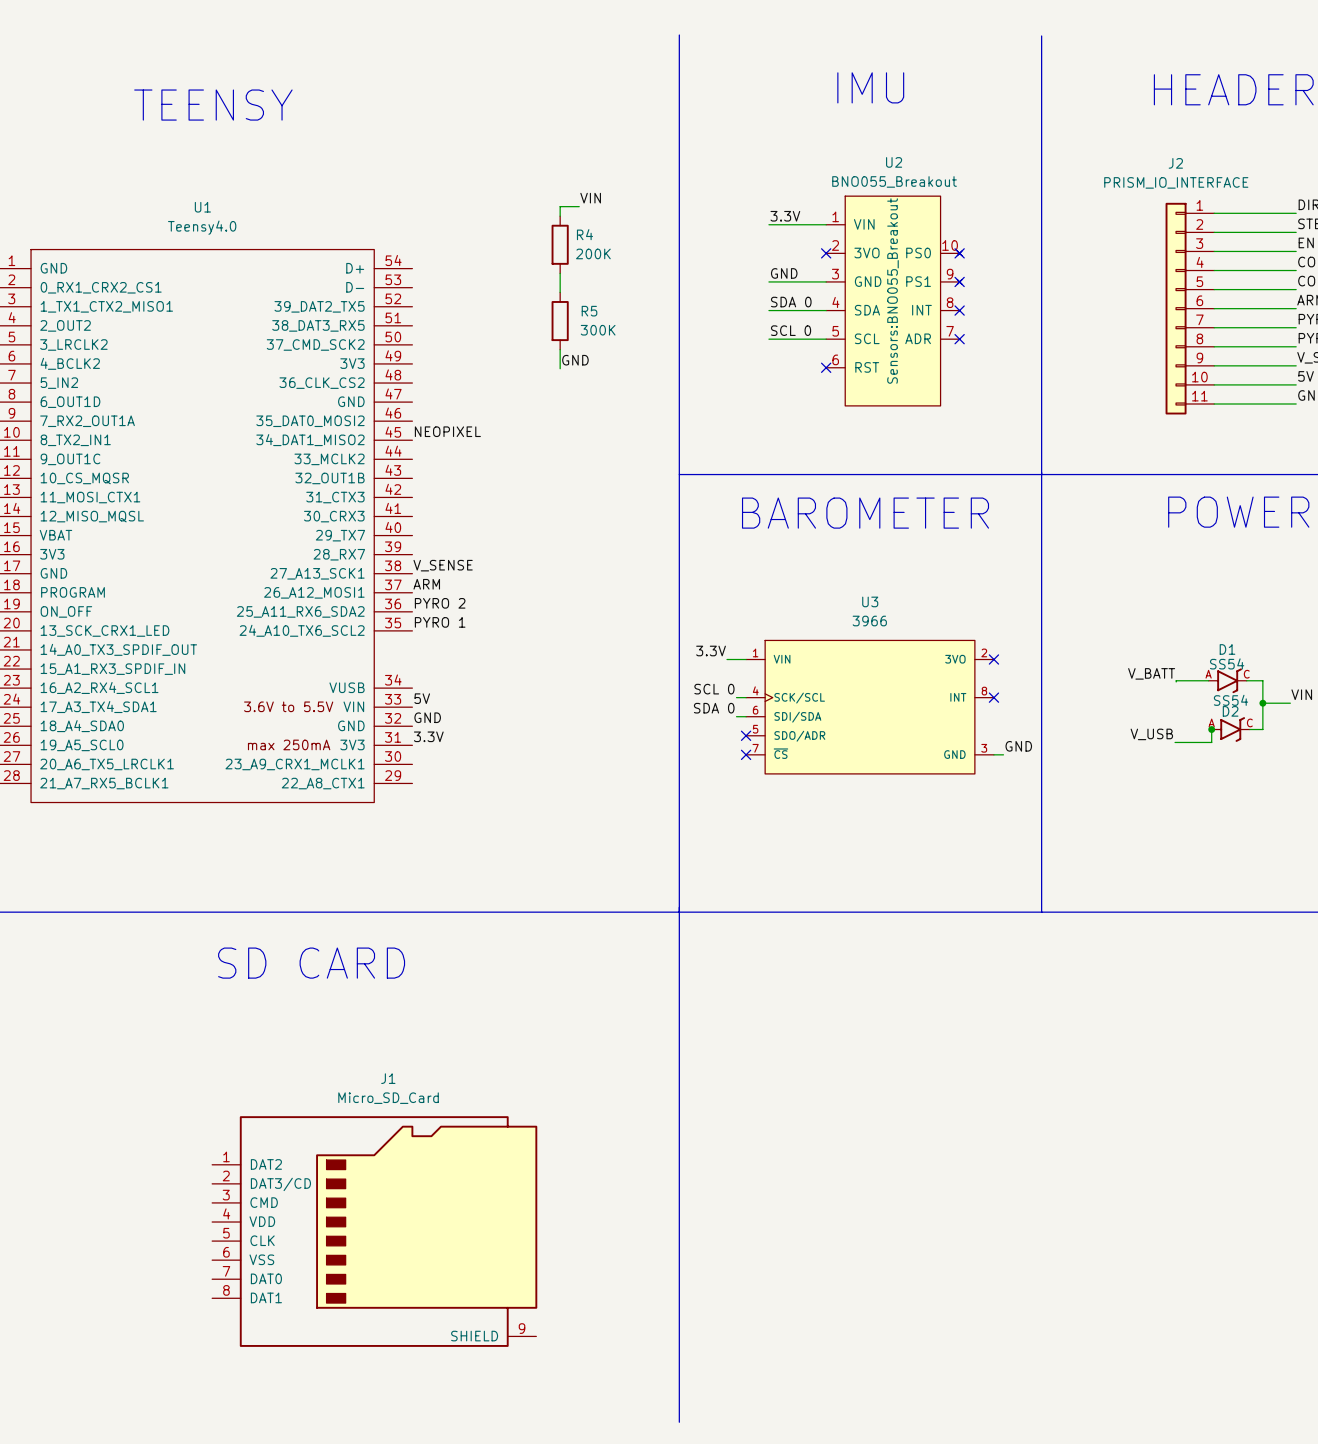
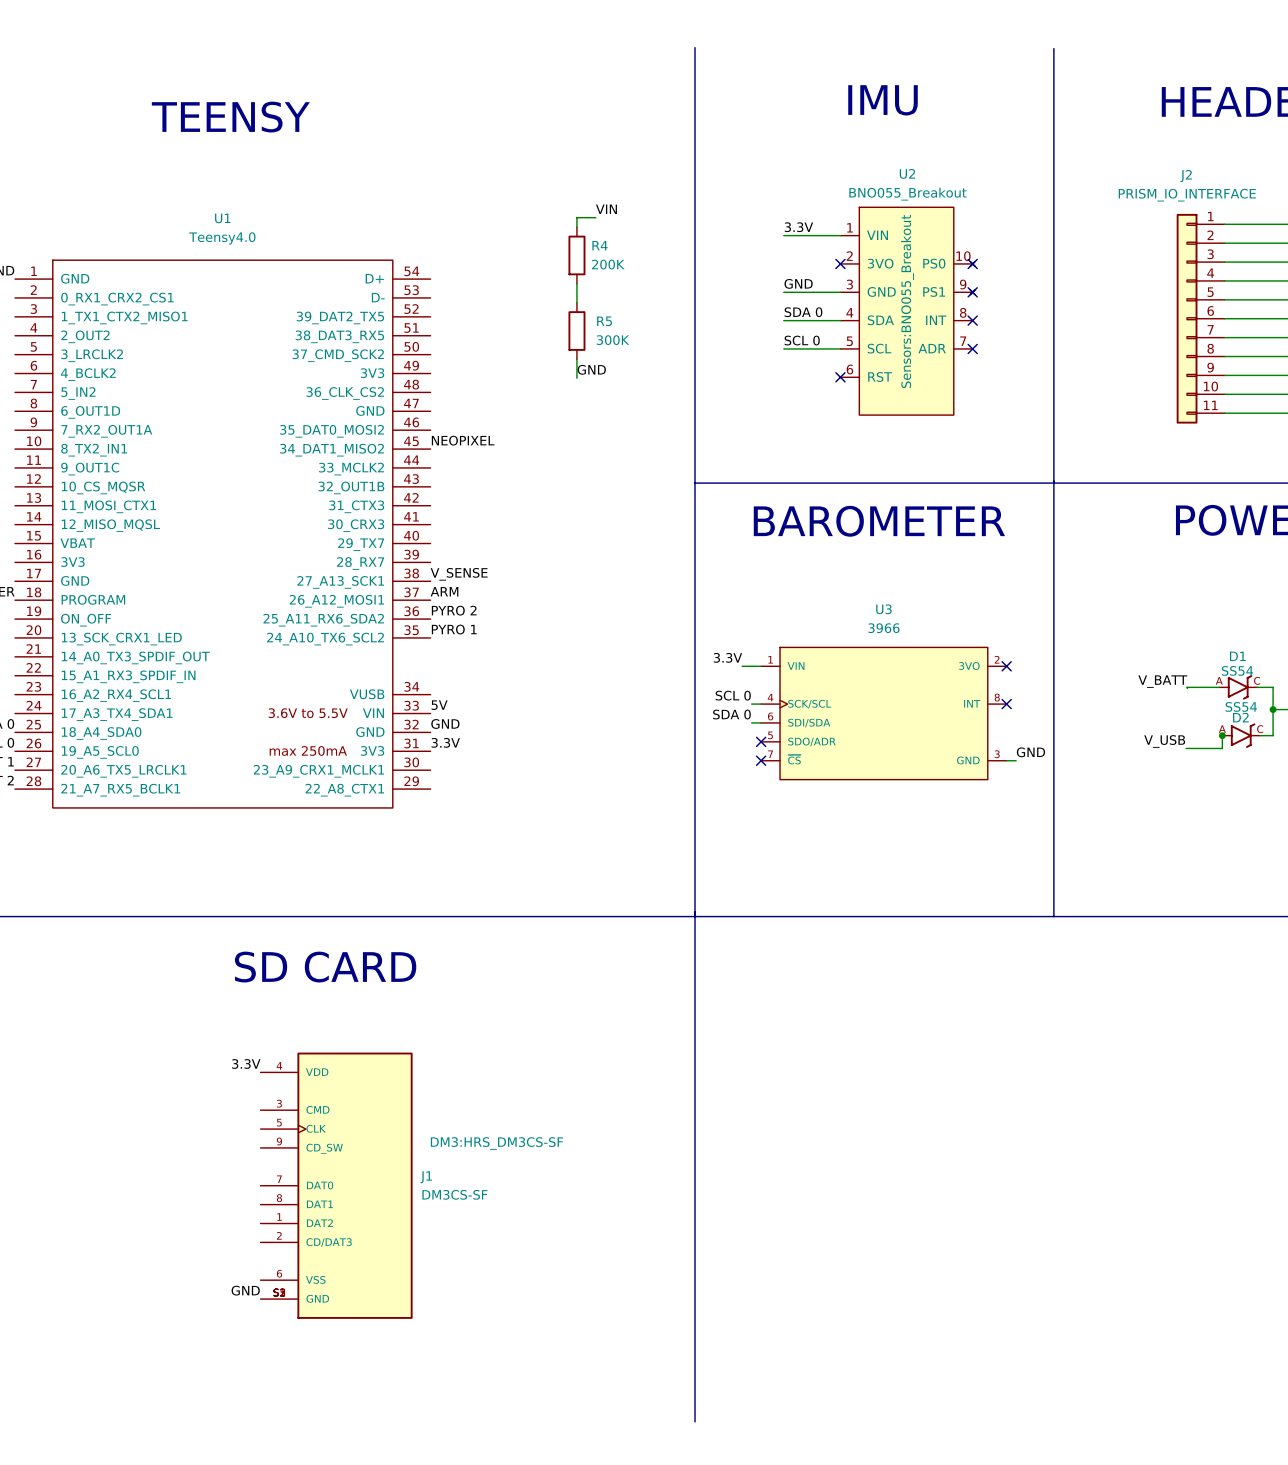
label: none -> 3.3V (246, 1063)
J1 name position: J1 (388, 1078) -> J1 (426, 1177)
J1 value: Micro_SD_Card (388, 1098) -> DM3CS-SF (454, 1194)
J1 symbol: [212, 1116, 538, 1347] -> [260, 1052, 413, 1319]
J1 text: none -> DM3:HRS_DM3CS-SF (496, 1143)
label: none -> GND (245, 1290)

